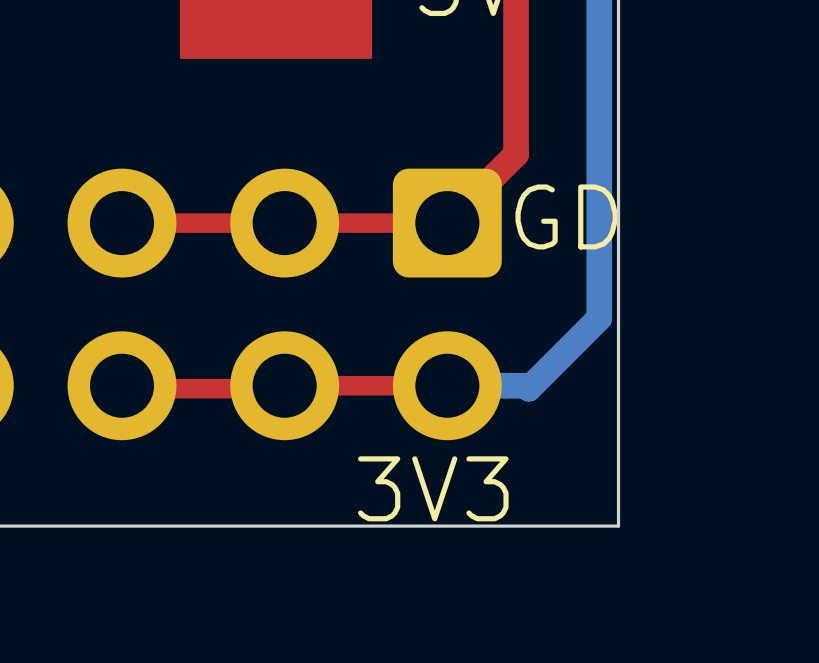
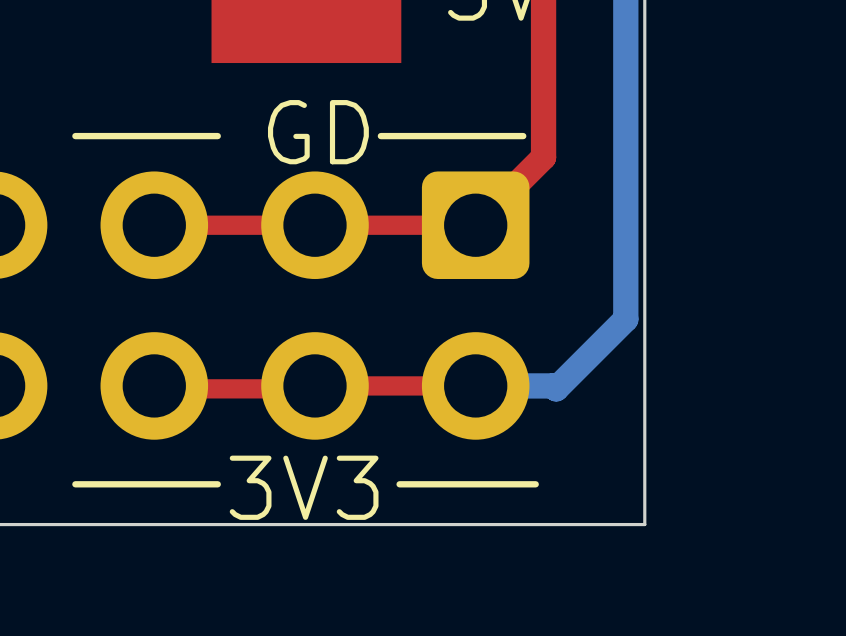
line: none -> (75, 136) (217, 136)
line: none -> (380, 136) (523, 136)
text position: GD (566, 216) -> GD (318, 132)
line: none -> (75, 484) (217, 484)
line: none -> (399, 484) (535, 484)
text position: 3V3 (433, 488) -> 3V3 (304, 487)

